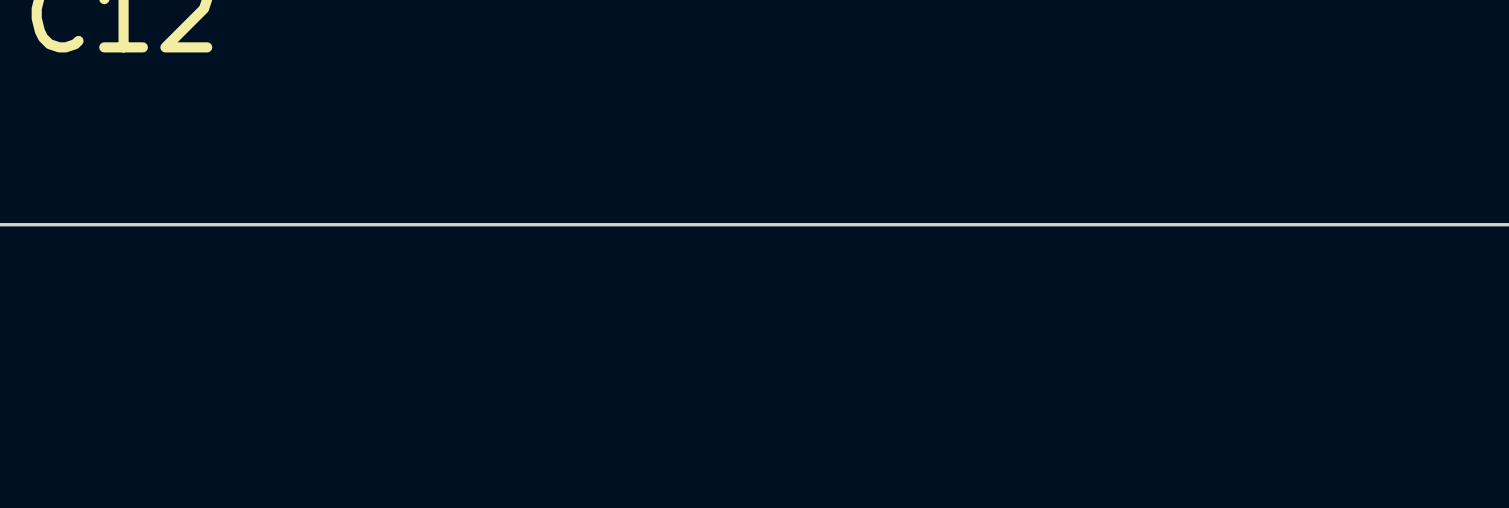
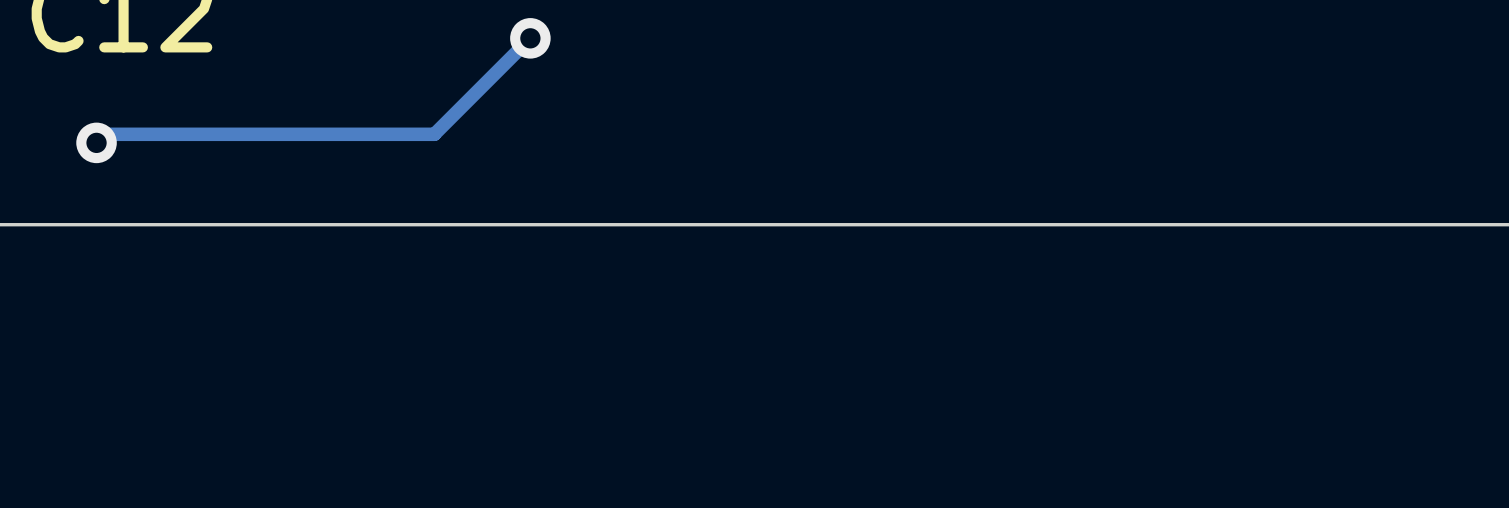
track: none -> (530, 38) (434, 134) (105, 134) (96, 142)
via: none -> (530, 38)
via: none -> (96, 142)

